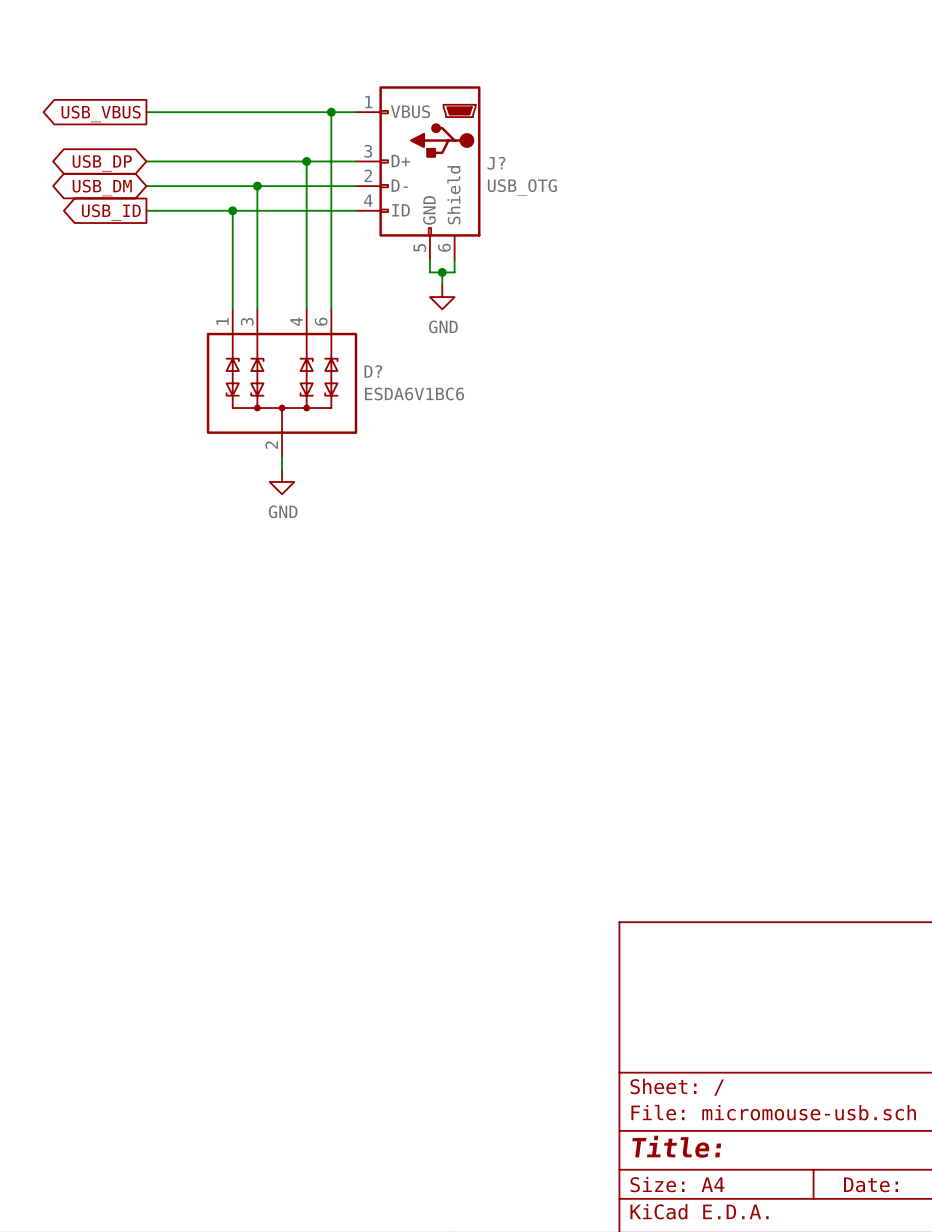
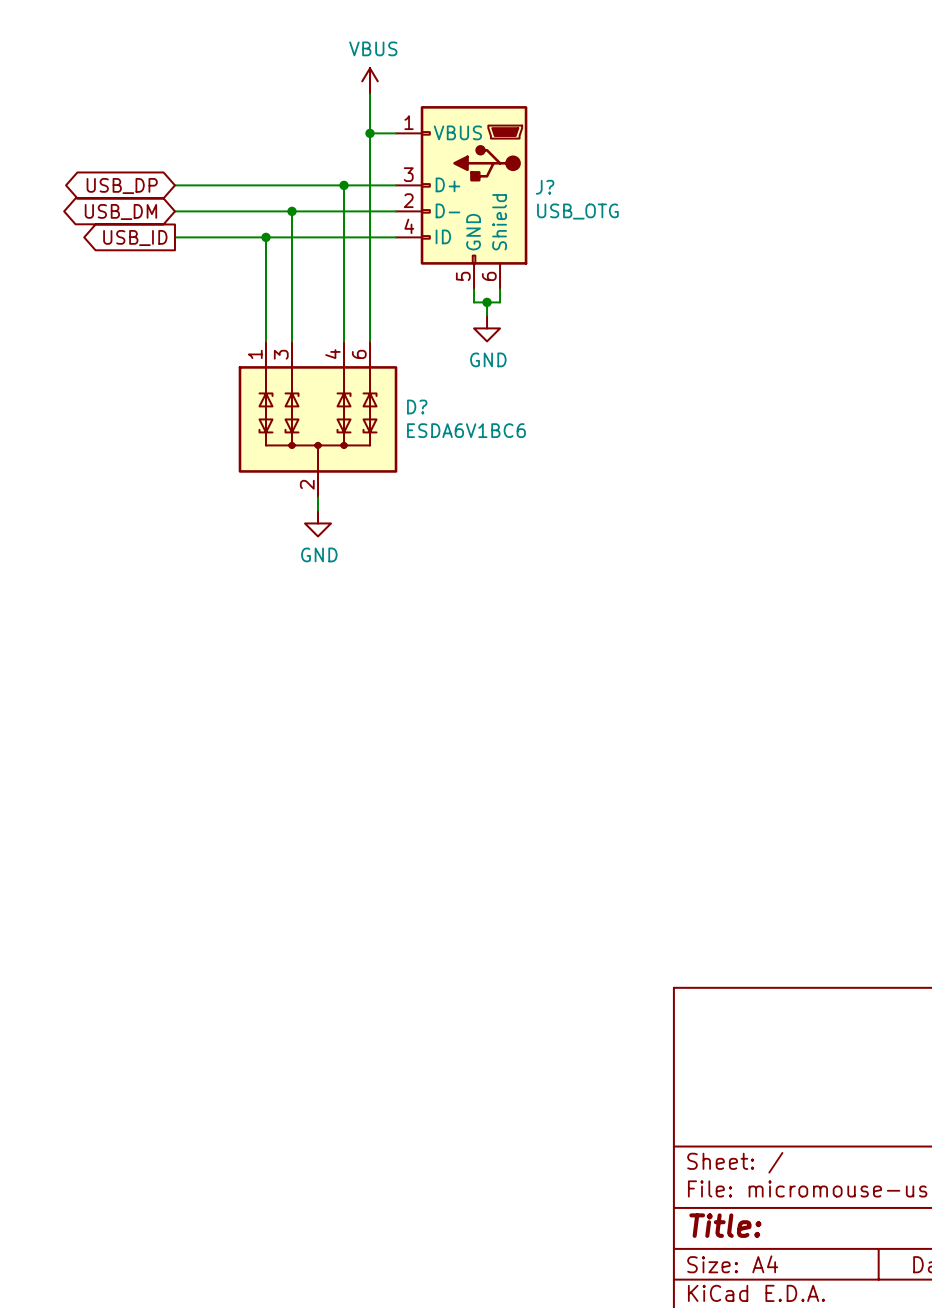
power symbol: none -> VBUS (370, 81)
wire: (146, 112) (331, 112) -> (370, 94) (370, 133)
global label: USB_VBUS (101, 114) -> none

